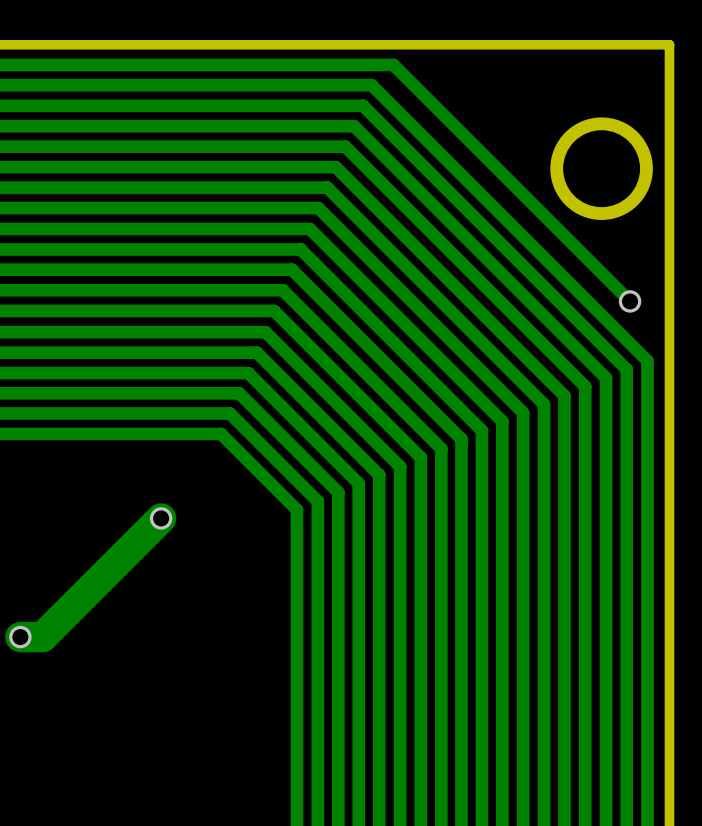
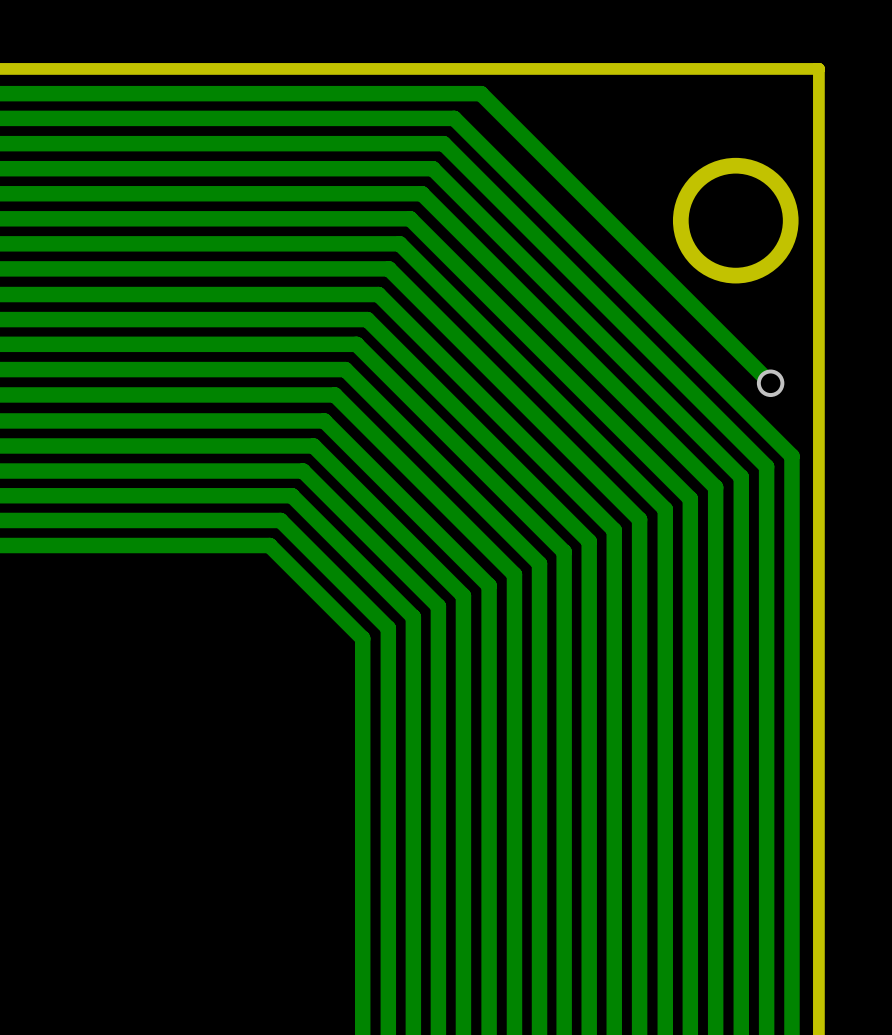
track: (161, 518) (42, 637) (20, 637) -> none
via: (161, 518) -> none
via: (20, 637) -> none

